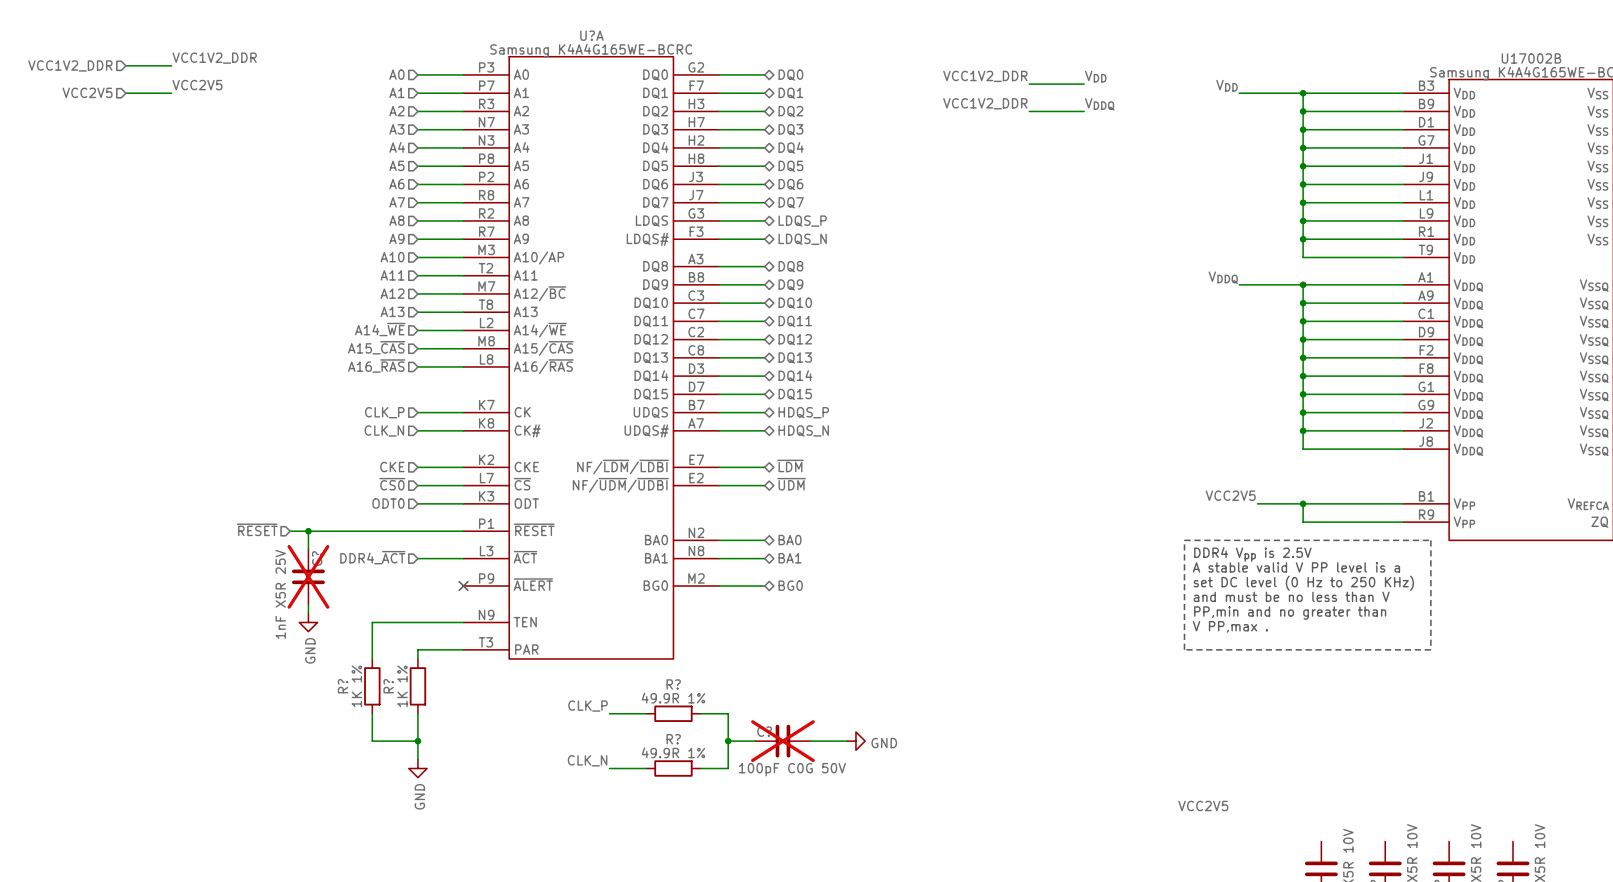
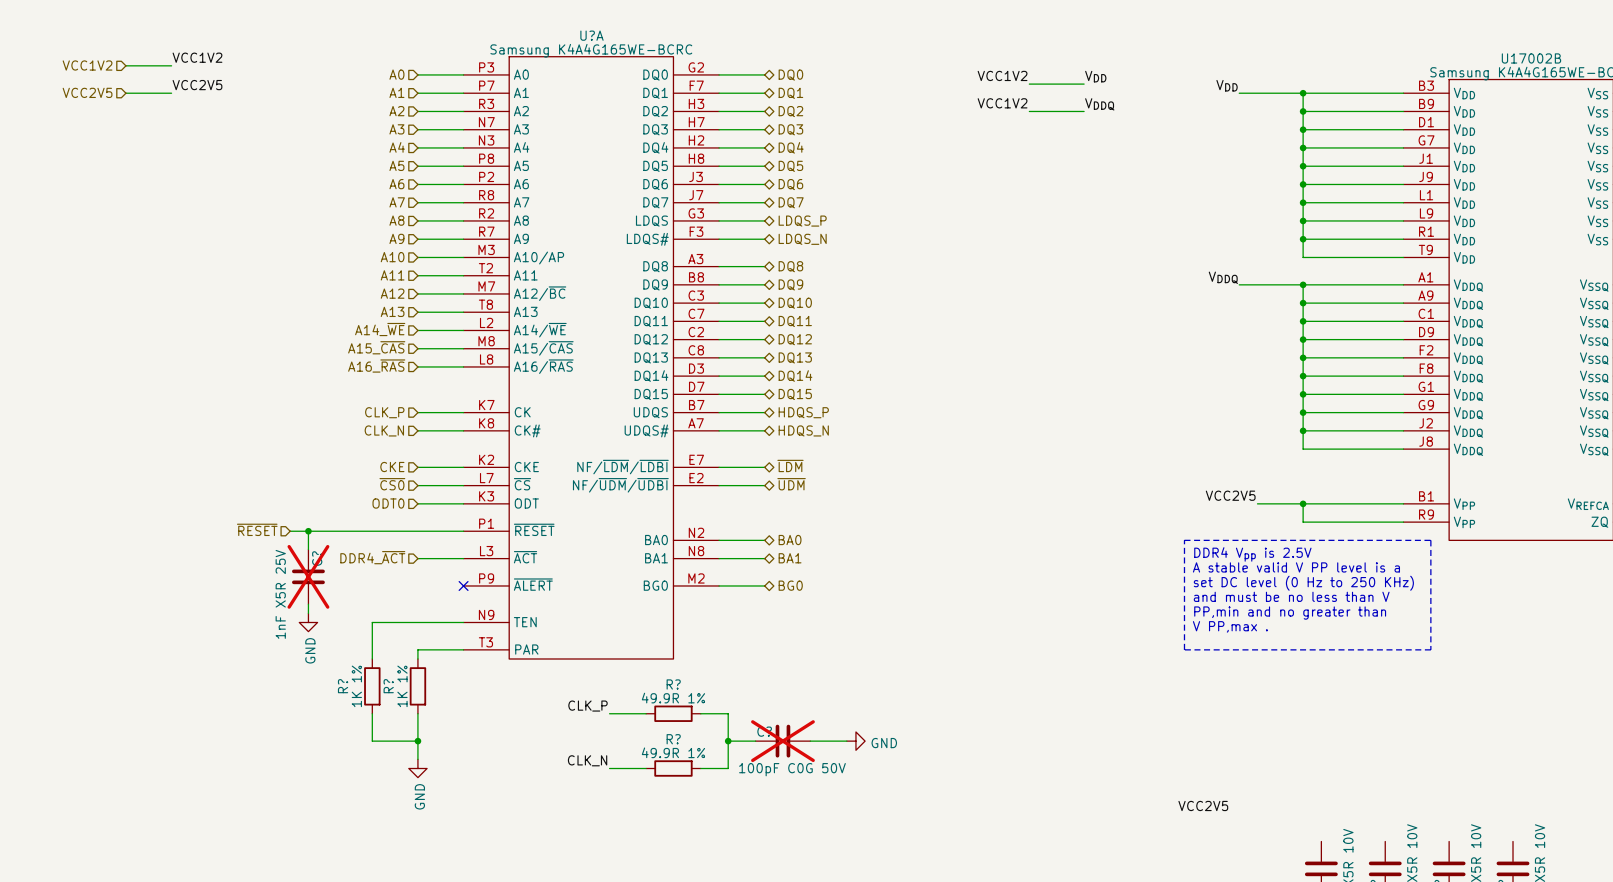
label: VCC1V2_DDR (214, 58) -> VCC1V2 (197, 57)
hierarchical label: VCC1V2_DDR (70, 65) -> VCC1V2 (87, 65)
label: VCC1V2_DDR (985, 76) -> VCC1V2 (1002, 75)
label: VCC1V2_DDR (985, 103) -> VCC1V2 (1002, 103)

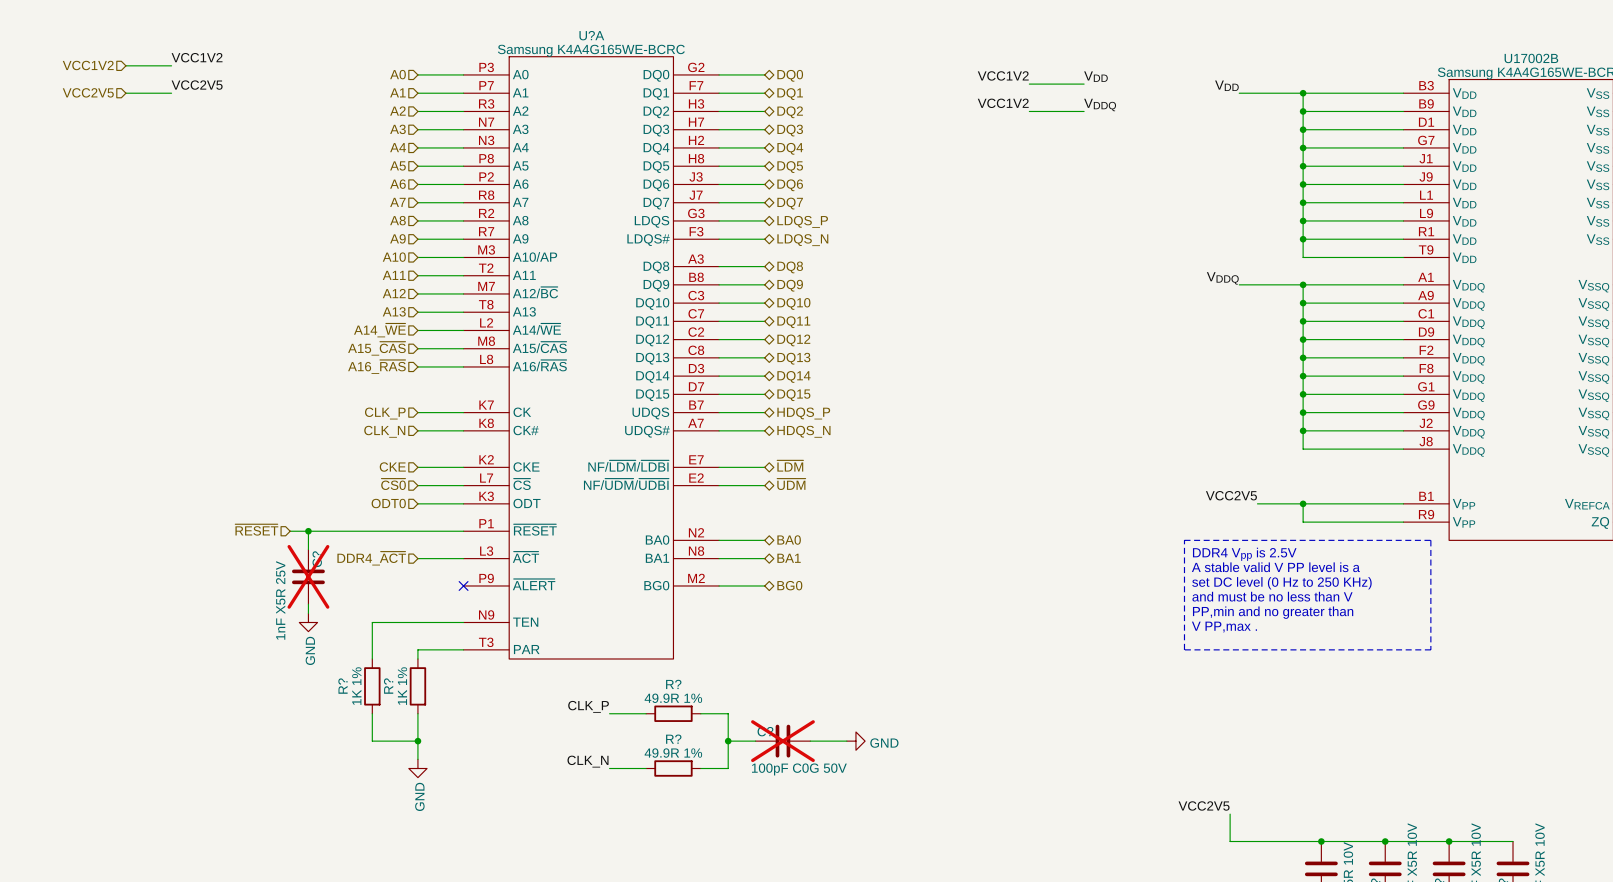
wire: none -> (1230, 814) (1230, 841) (1513, 841)
junction: none -> (1321, 841)
junction: none -> (1385, 841)
junction: none -> (1449, 841)

